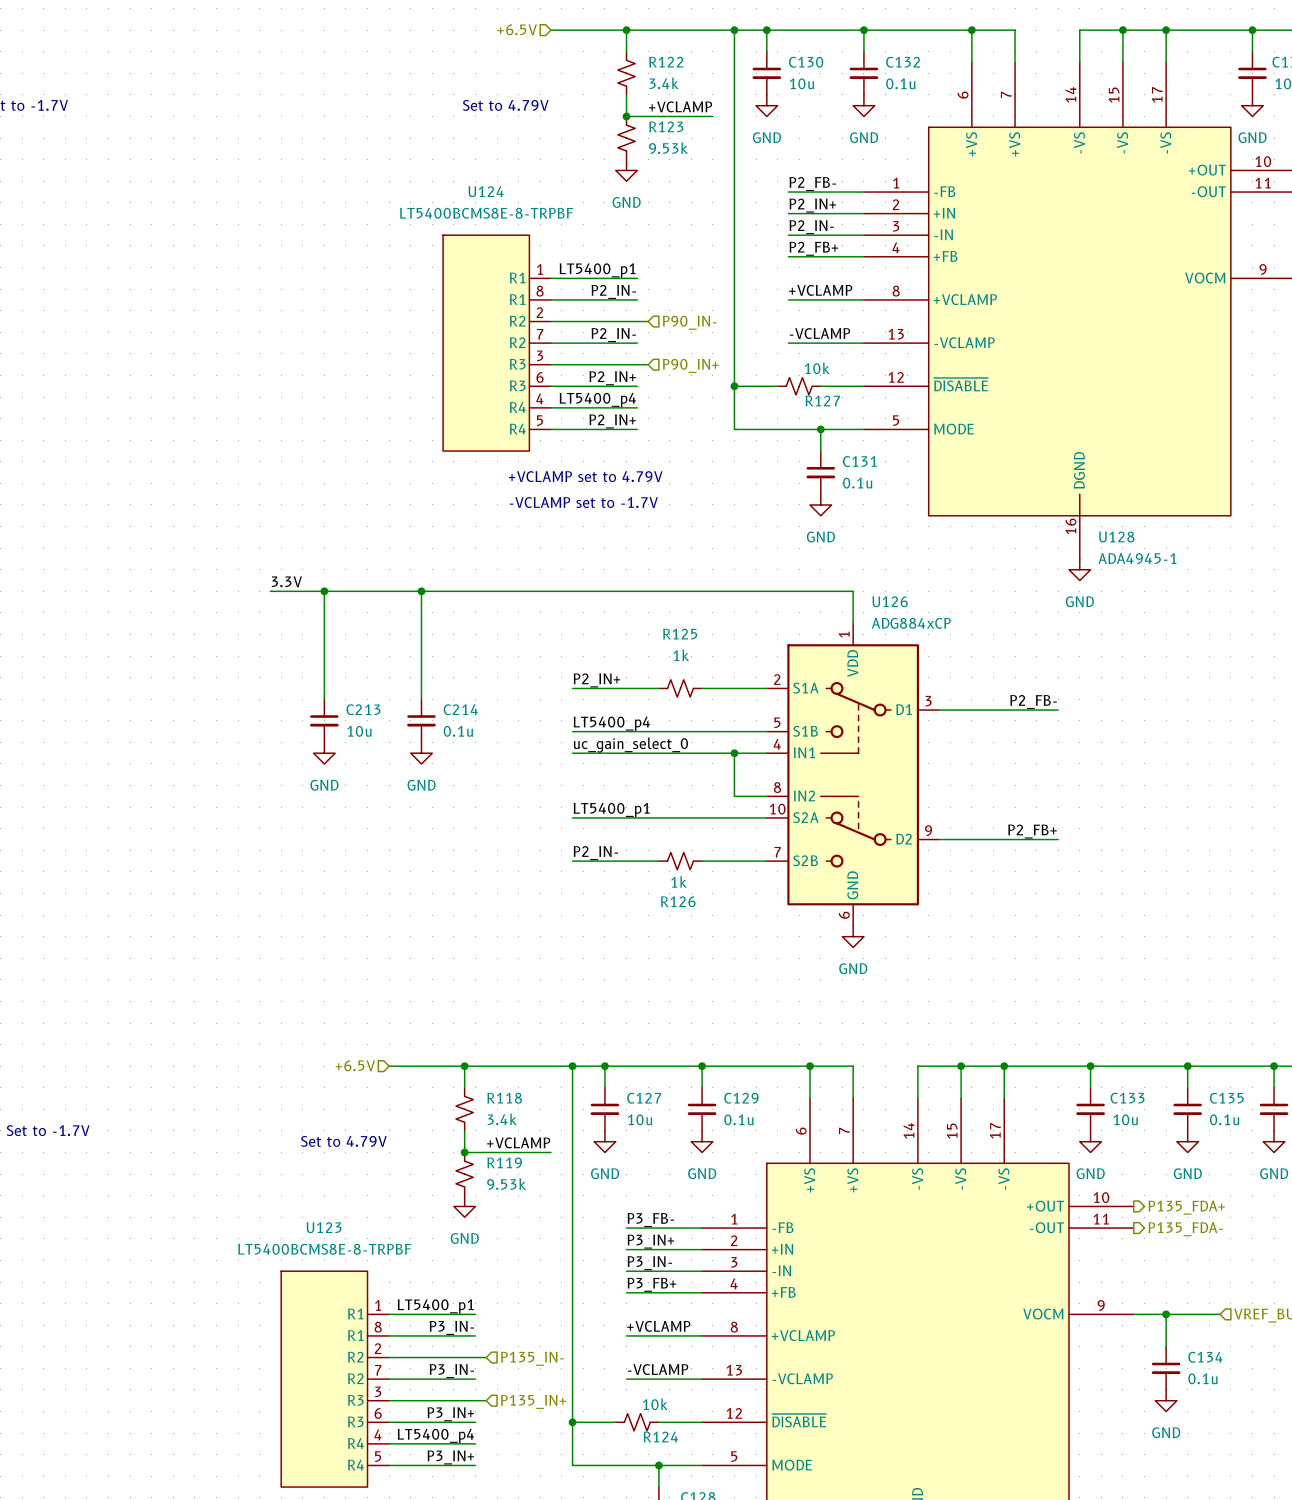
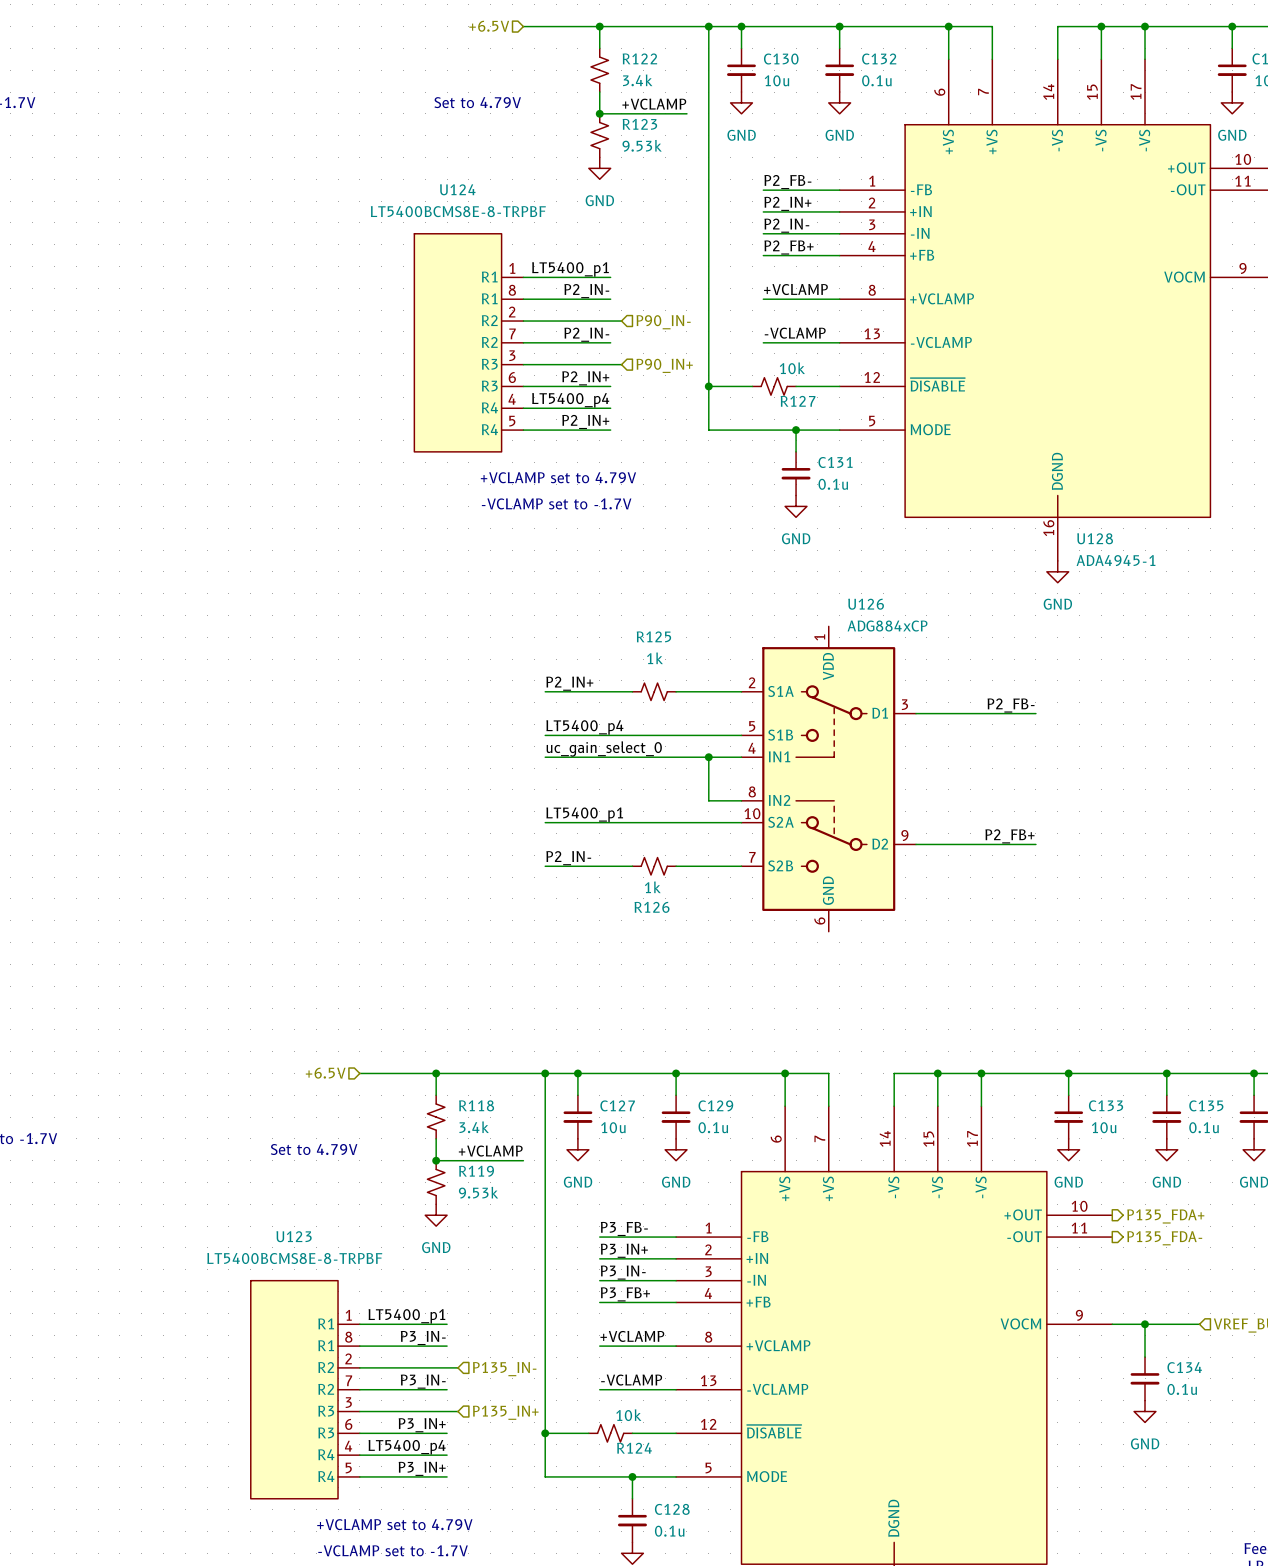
label: 3.3V (286, 581) -> none
wire: (270, 591) (853, 591) (853, 623) -> none
wire: (324, 591) (324, 699) -> none
junction: (324, 591) -> none
wire: (421, 591) (421, 699) -> none
junction: (421, 591) -> none
C213: 10u (324, 720) -> none
C214: 0.1u (421, 720) -> none
power symbol: GND (324, 753) -> none
power symbol: GND (421, 753) -> none
power symbol: GND (853, 936) -> none

